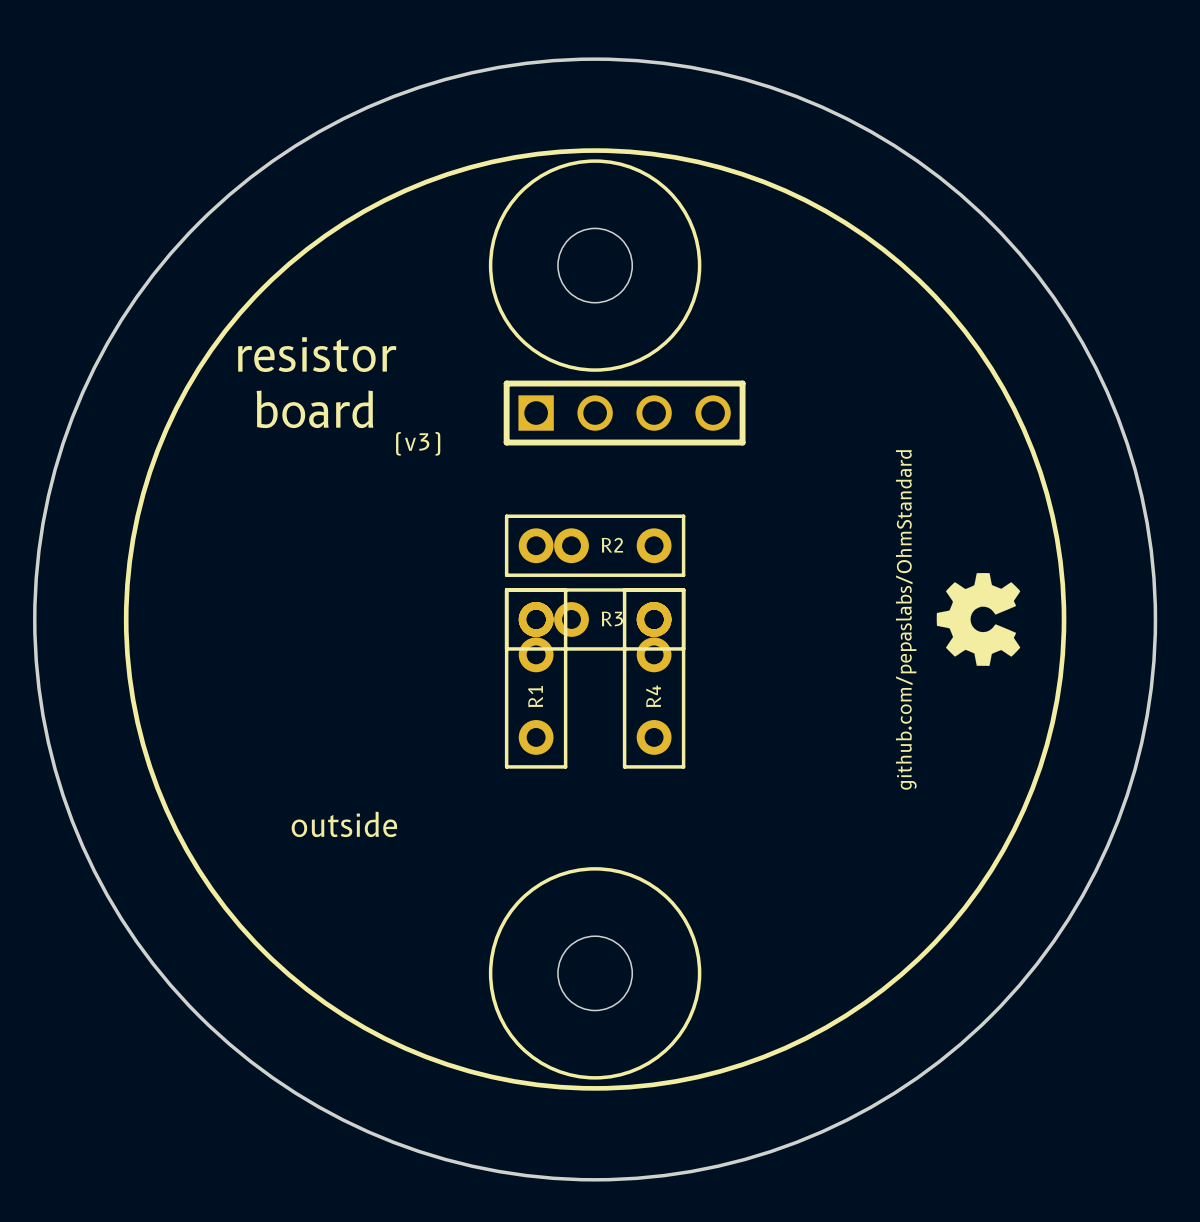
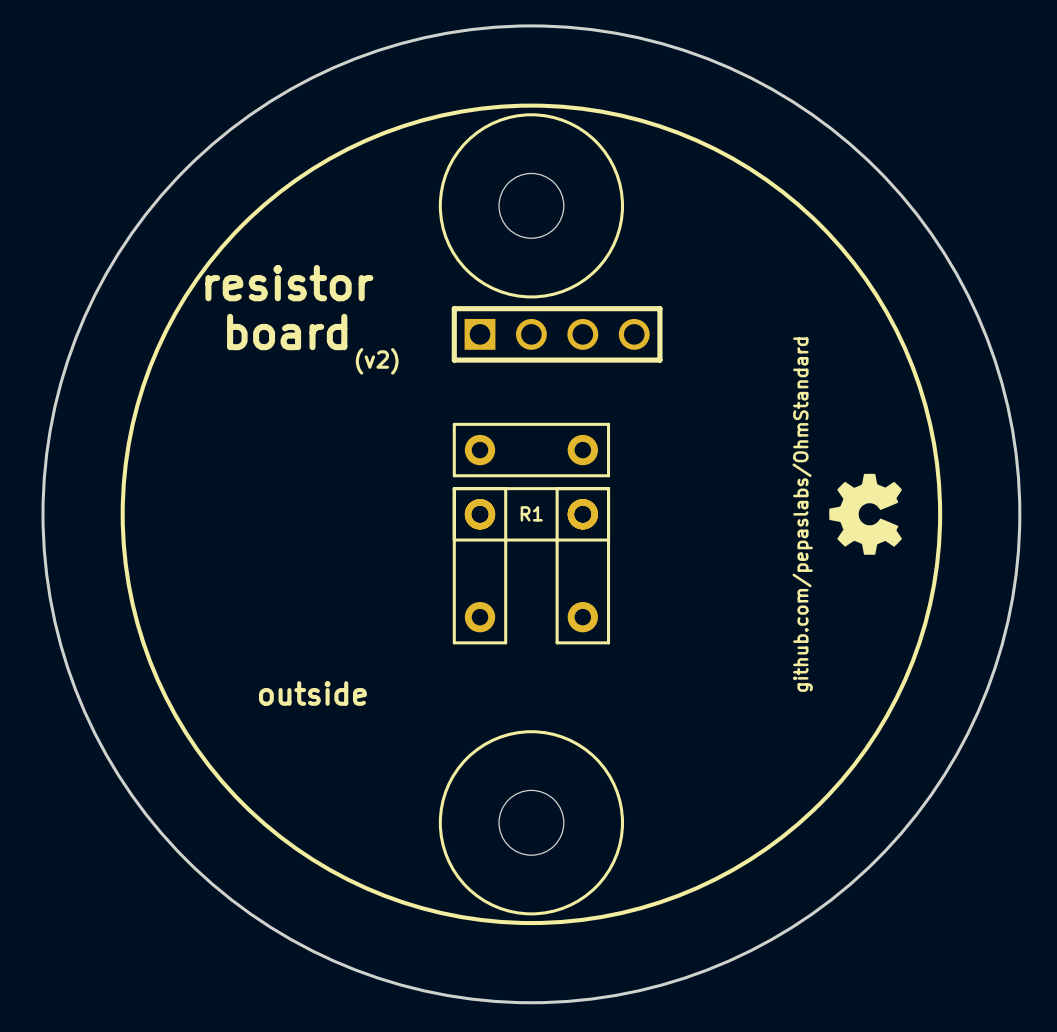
text: (v3) (418, 443) -> (v2) (377, 361)
R2: (595, 545) -> none
part: none -> (531, 450)
R1 footprint: [504, 588, 568, 769] -> [452, 487, 611, 542]
R3: (595, 619) -> none
part: none -> (480, 565)
R4: (654, 678) -> none
part: none -> (582, 565)

